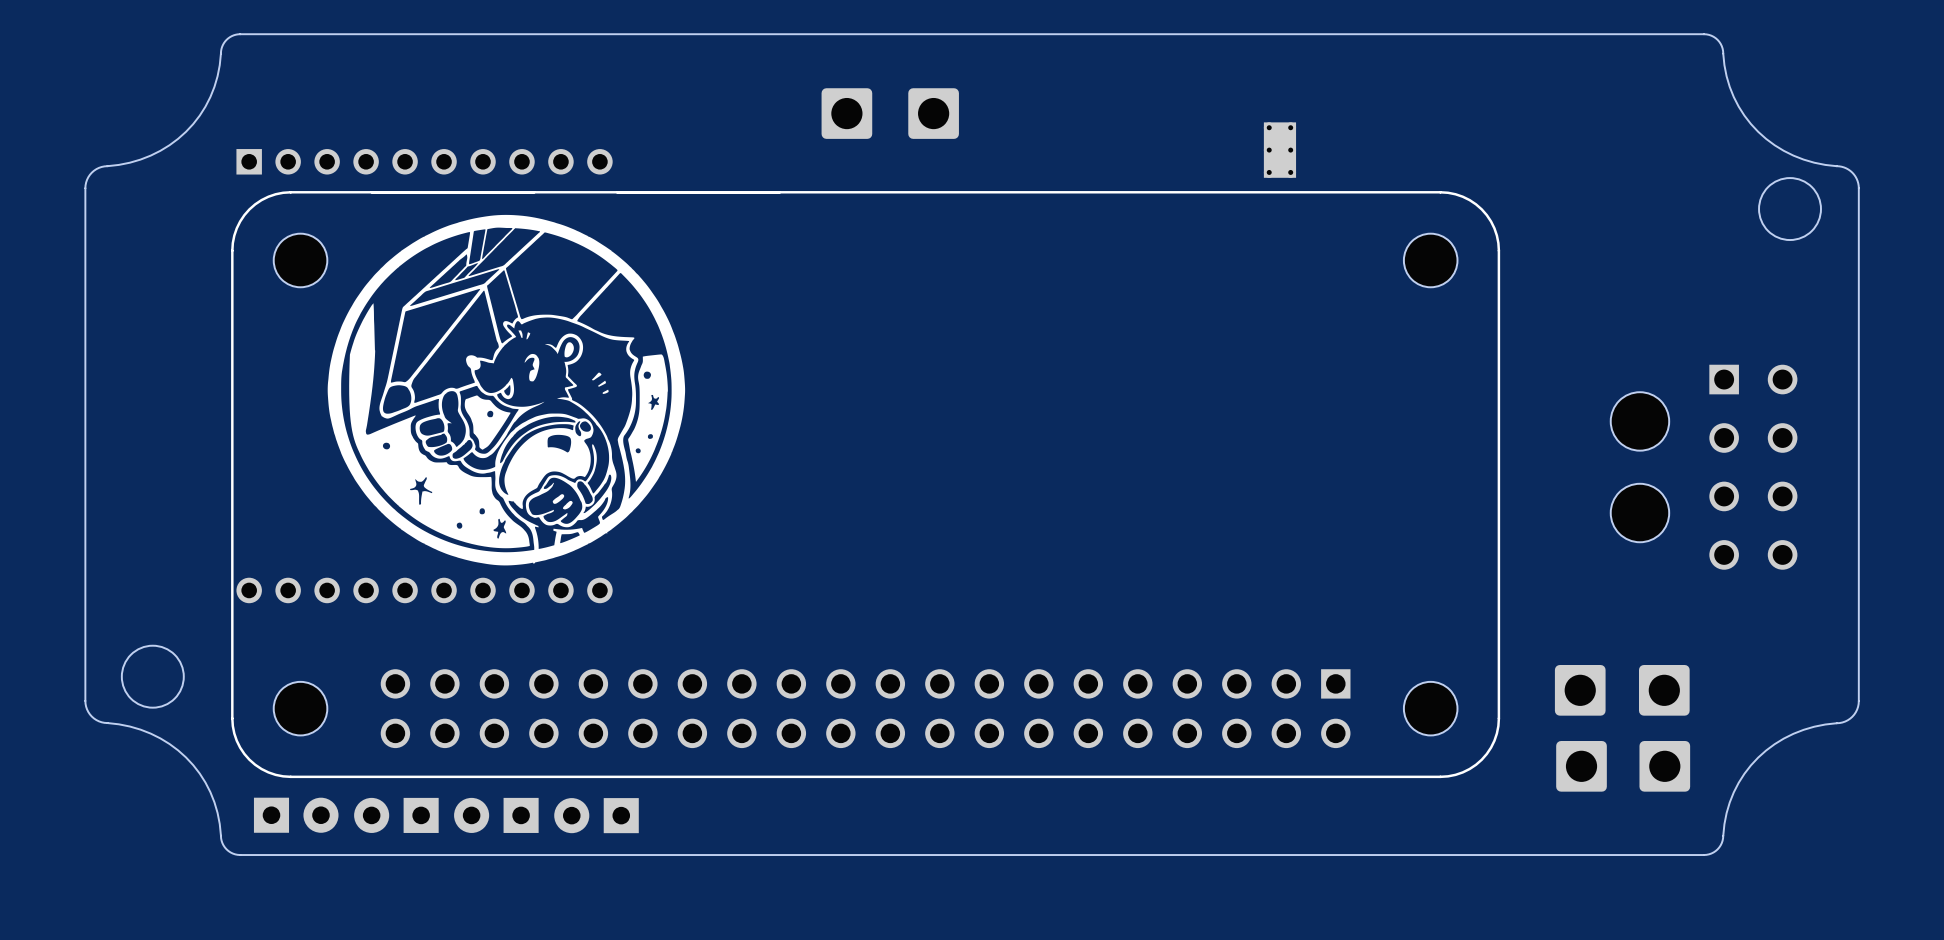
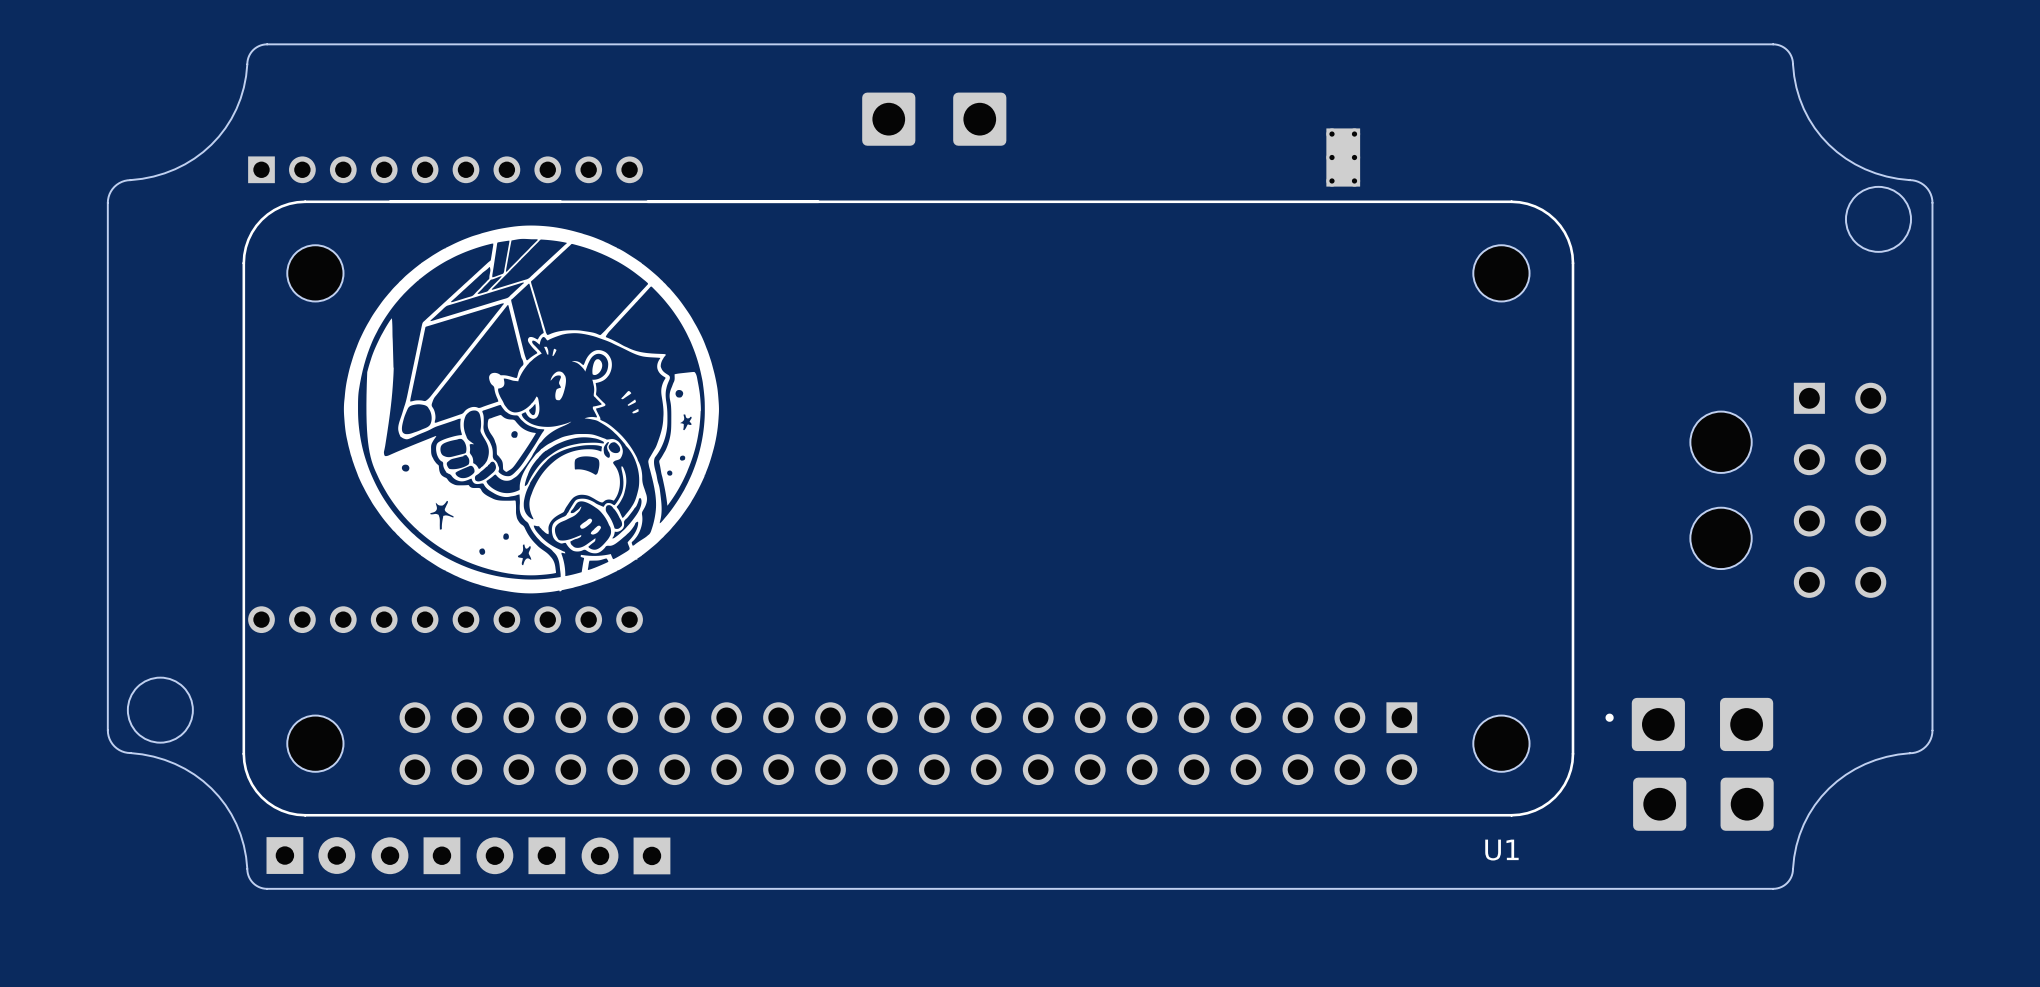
board edge: (220, 53) (217, 76) (210, 97) (199, 115) (186, 131) (169, 145) (150, 155) (129, 162) (96, 169) (88, 177) (85, 188) (86, 706) (89, 714) (96, 720) (129, 726) (150, 733) (169, 744) (186, 757) (199, 773) (210, 792) (217, 812) (220, 835) -> none
board edge: (1723, 53) (1717, 39) (1703, 34) (240, 34) (226, 39) (220, 53) -> none
board edge: (1723, 53) (1726, 76) (1733, 97) (1744, 115) (1758, 131) (1774, 145) (1793, 155) (1814, 162) (1846, 168) (1854, 174) (1858, 183) (1858, 701) (1855, 712) (1847, 720) (1814, 726) (1793, 733) (1774, 744) (1758, 757) (1744, 773) (1733, 792) (1726, 813) (1722, 840) (1713, 852) (1703, 855) (240, 855) -> none
board edge: none -> (247, 64) (243, 87) (236, 109) (225, 128) (211, 144) (194, 158) (175, 169) (153, 176) (119, 183) (110, 191) (107, 202) (108, 736) (112, 744) (119, 750) (153, 756) (175, 763) (194, 774) (211, 788) (225, 805) (236, 824) (243, 845) (247, 868)
board edge: none -> (1792, 64) (1787, 50) (1773, 44) (267, 44) (253, 50) (247, 64)
board edge: none -> (1792, 64) (1796, 87) (1803, 109) (1814, 128) (1828, 144) (1845, 158) (1865, 169) (1886, 176) (1921, 183) (1927, 189) (1931, 196) (1932, 730) (1929, 741) (1921, 750) (1886, 756) (1865, 764) (1845, 774) (1828, 788) (1814, 805) (1803, 824) (1796, 845) (1791, 875) (1781, 886) (1773, 888) (267, 888) (253, 883) (247, 869)
U1: none -> (928, 508)
board edge: (220, 835) (226, 849) (240, 855) -> none

